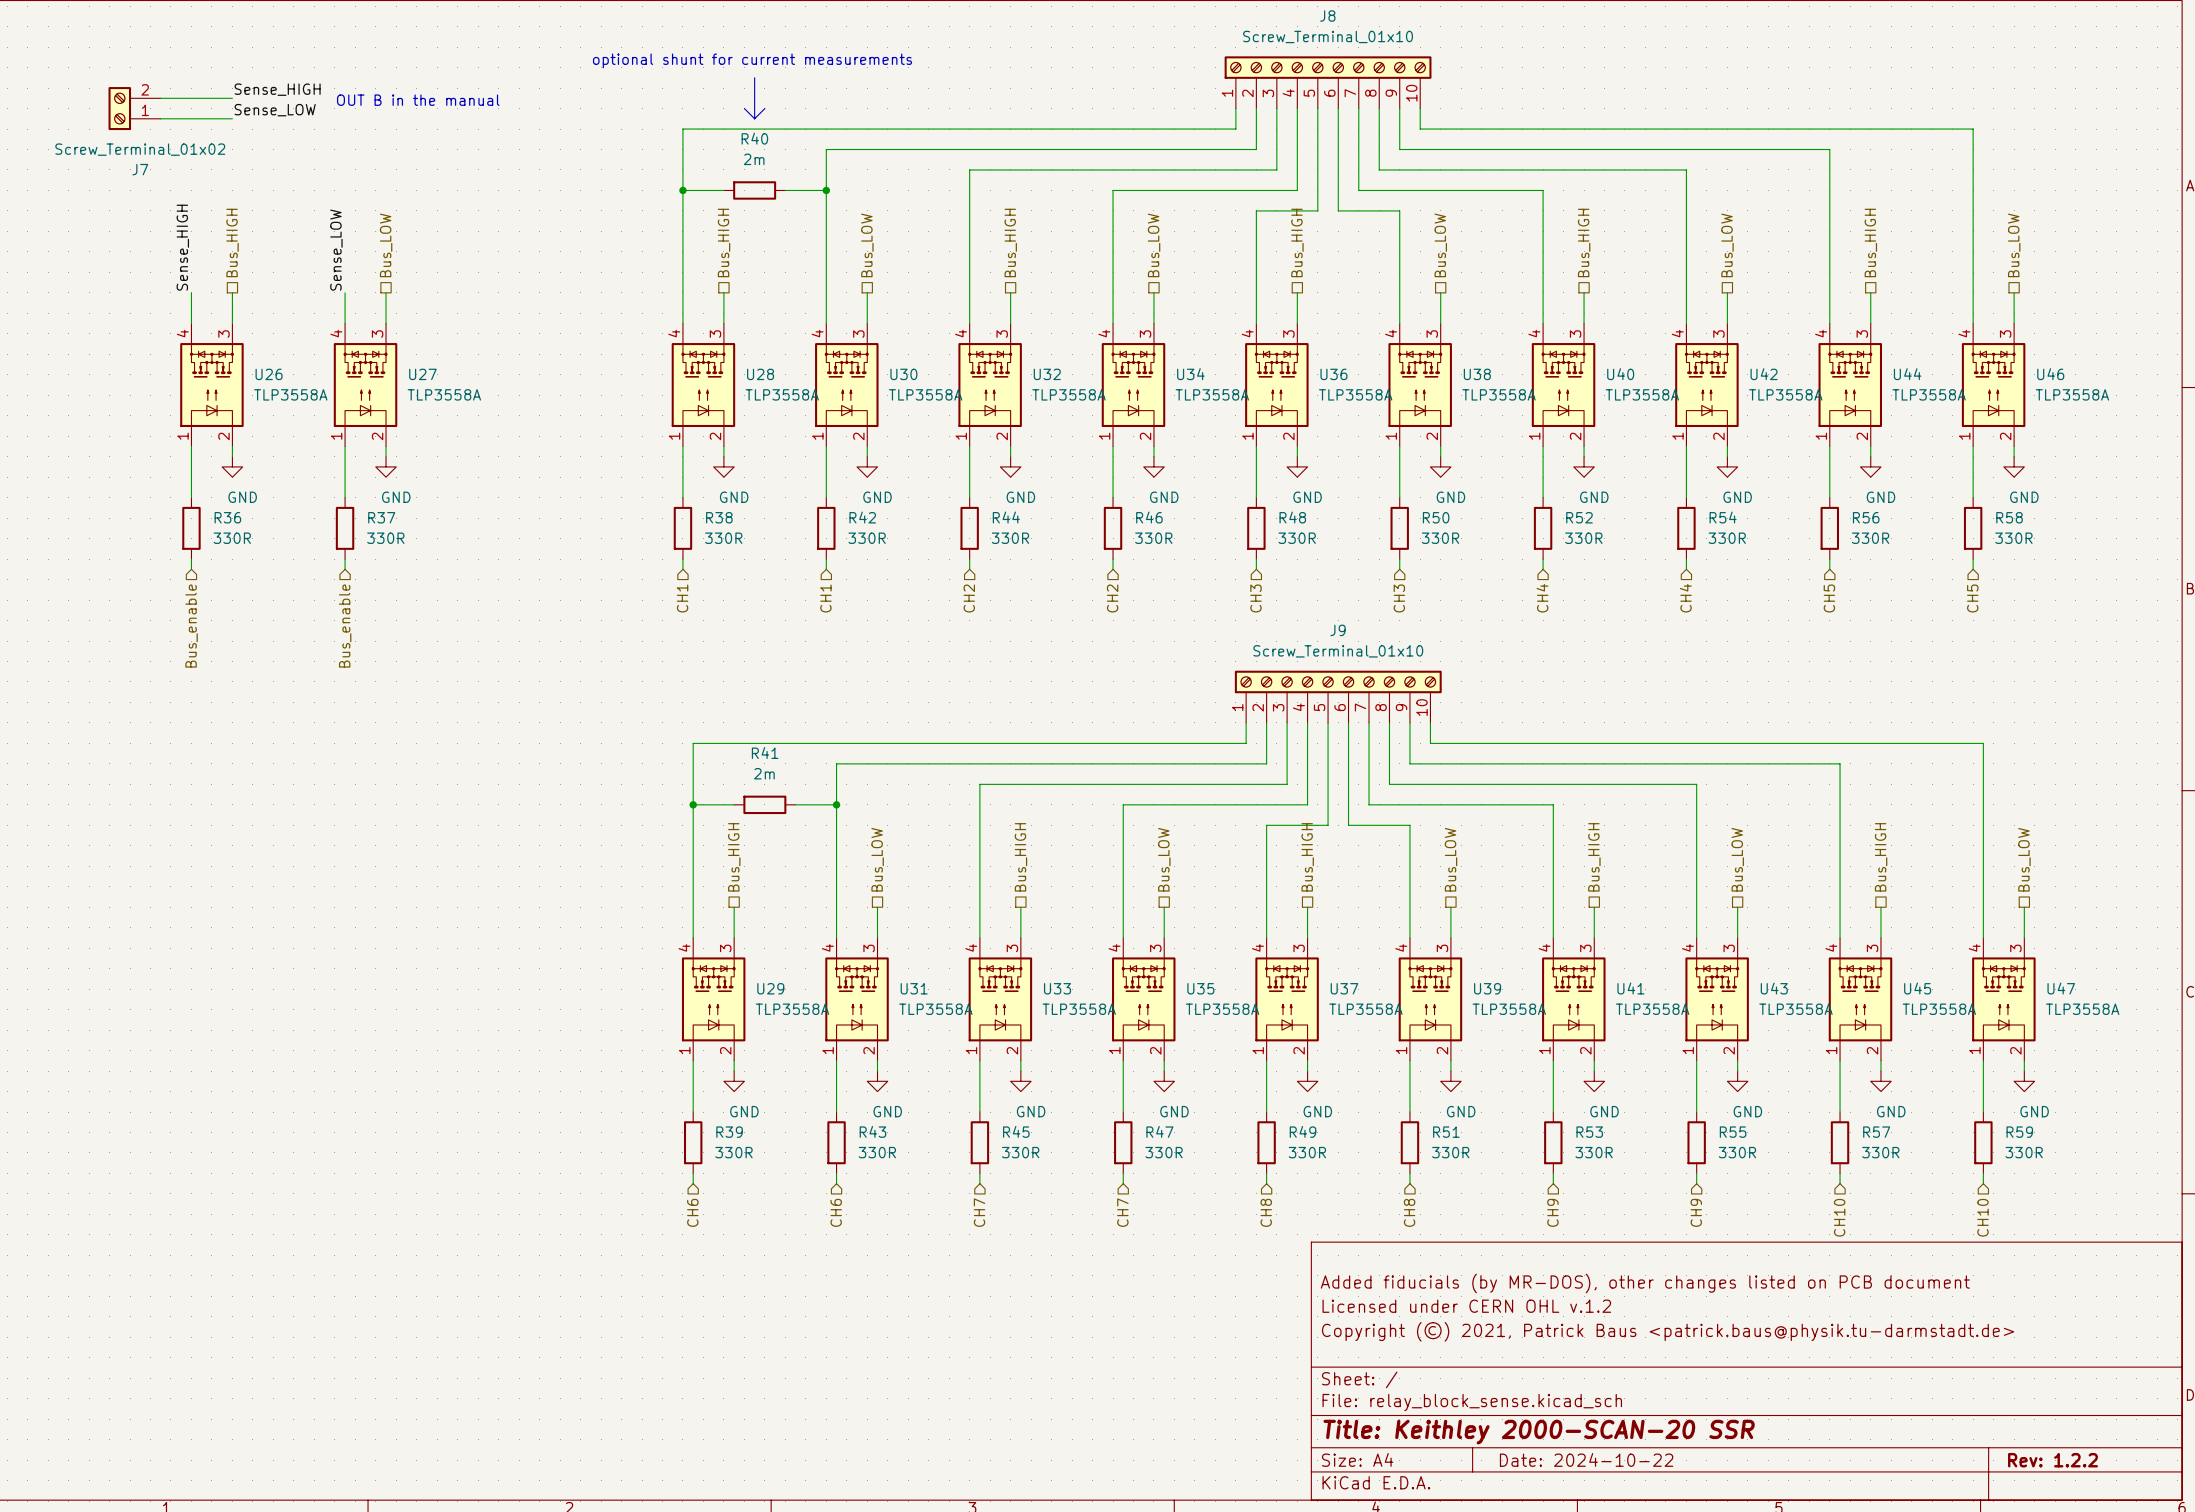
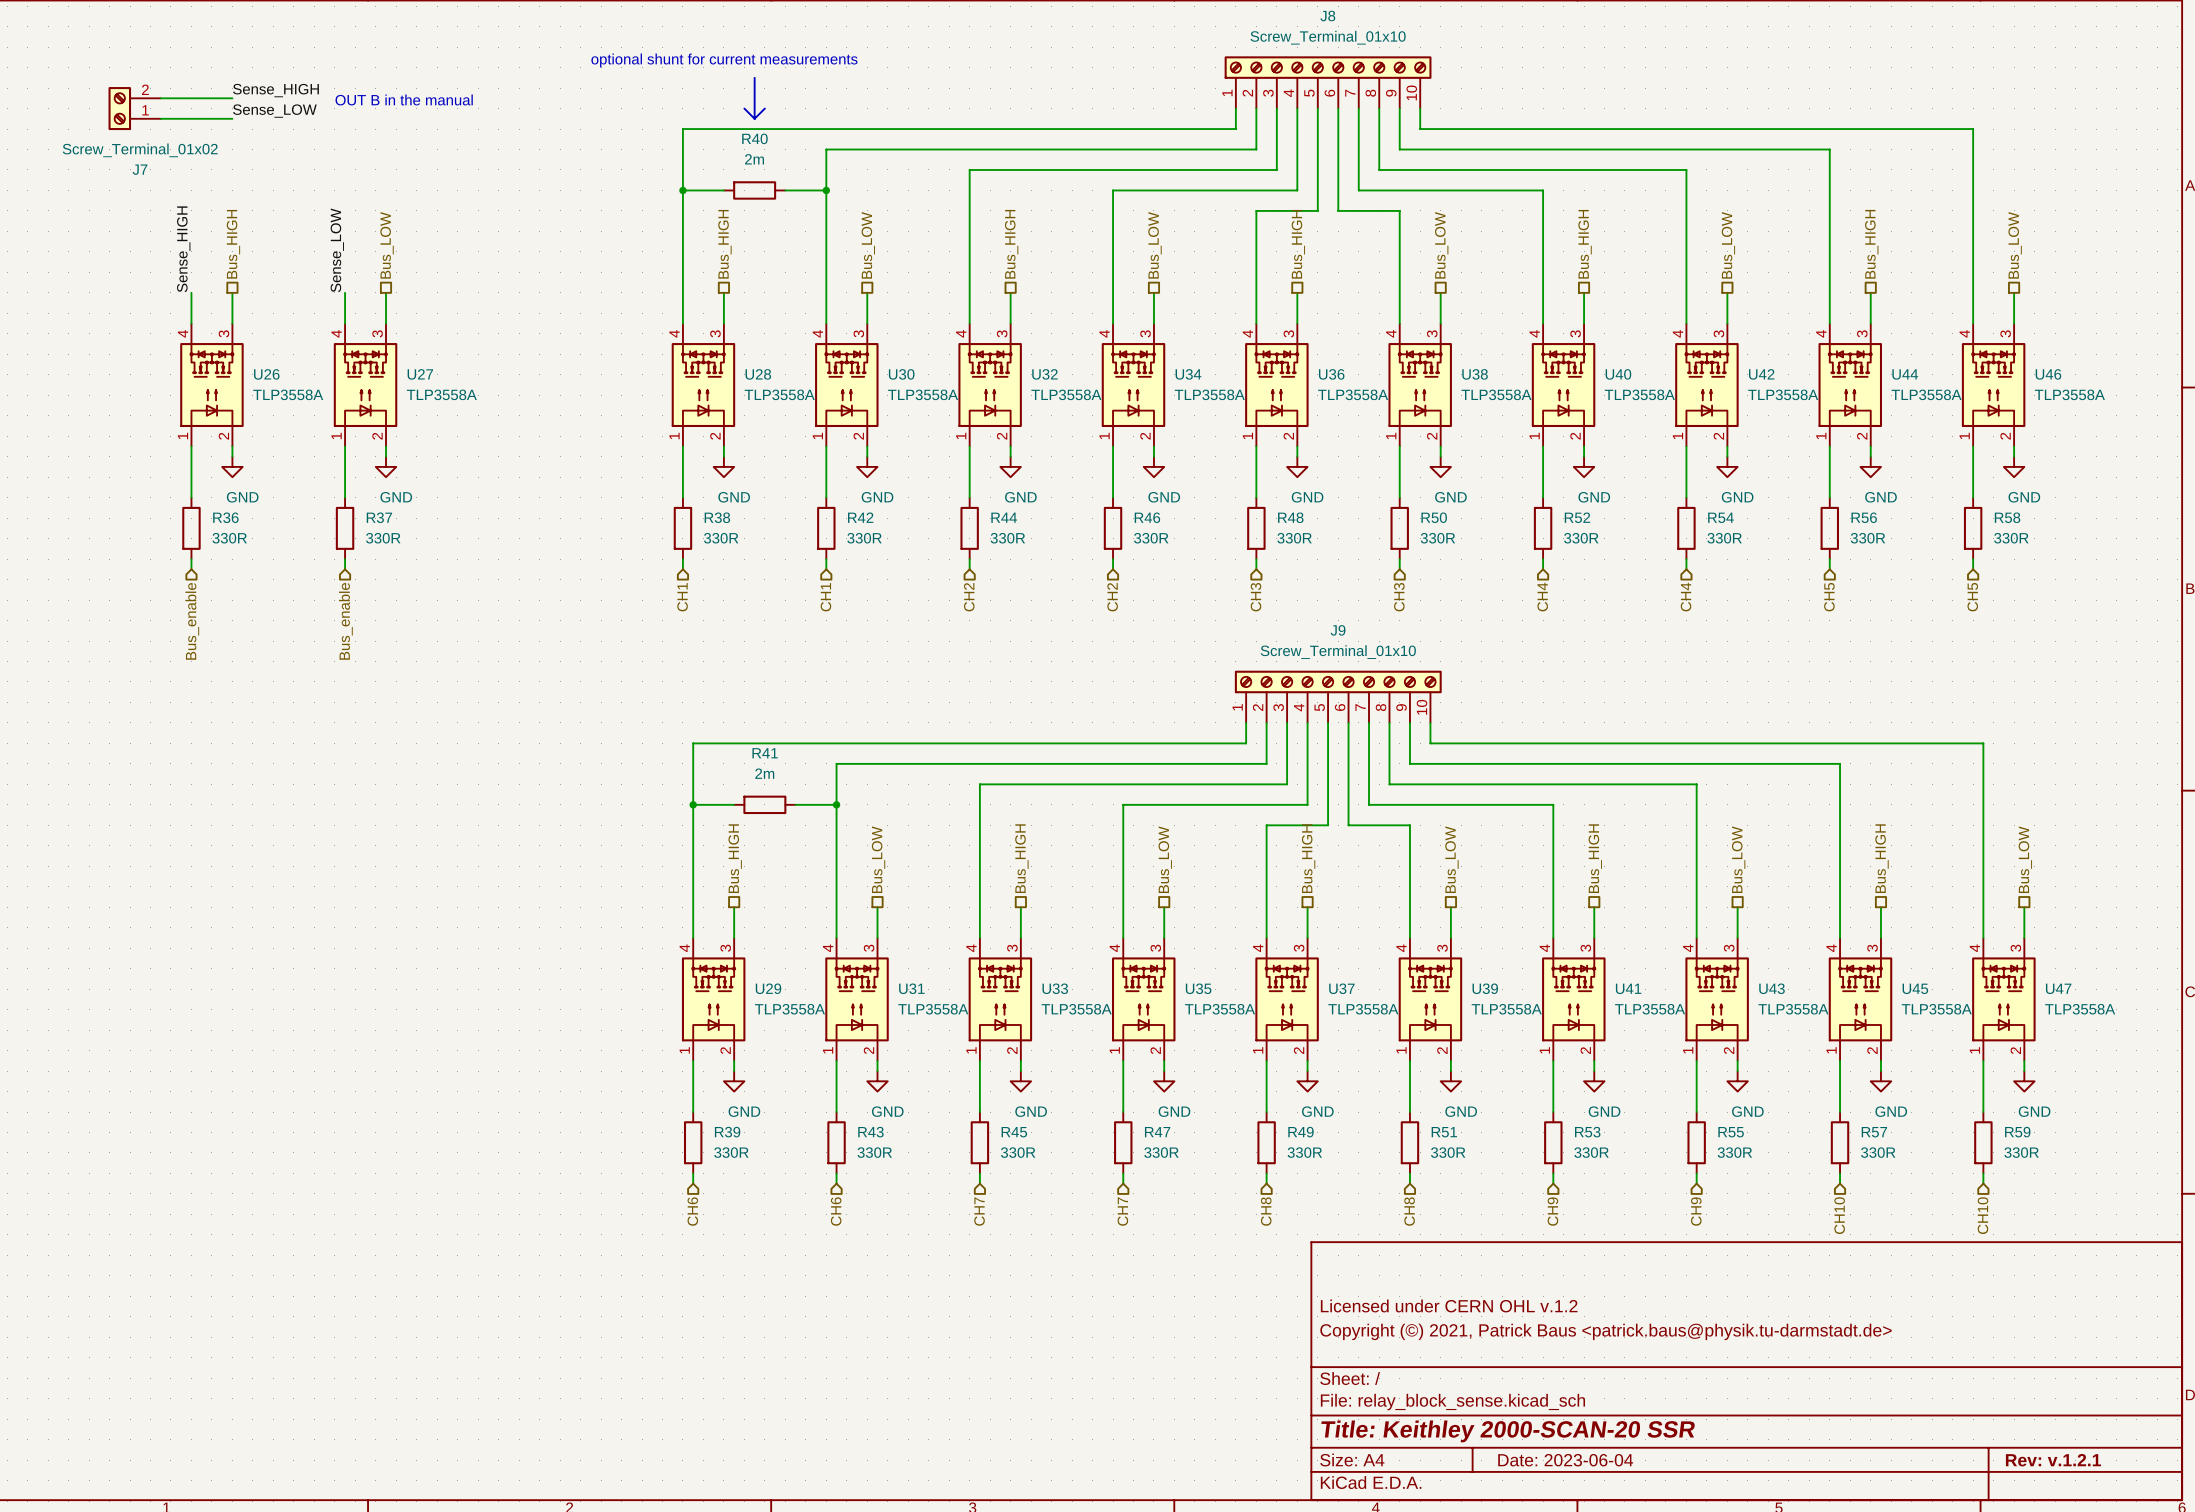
title block: Added fiducials (by MR-DOS), other changes listed on PCB document (1645, 1283) -> none
title block: Date: 2024-10-22 (1586, 1459) -> Date: 2023-06-04 (1565, 1460)
title block: Rev: 1.2.2 (2052, 1460) -> Rev: v.1.2.1 (2053, 1460)

